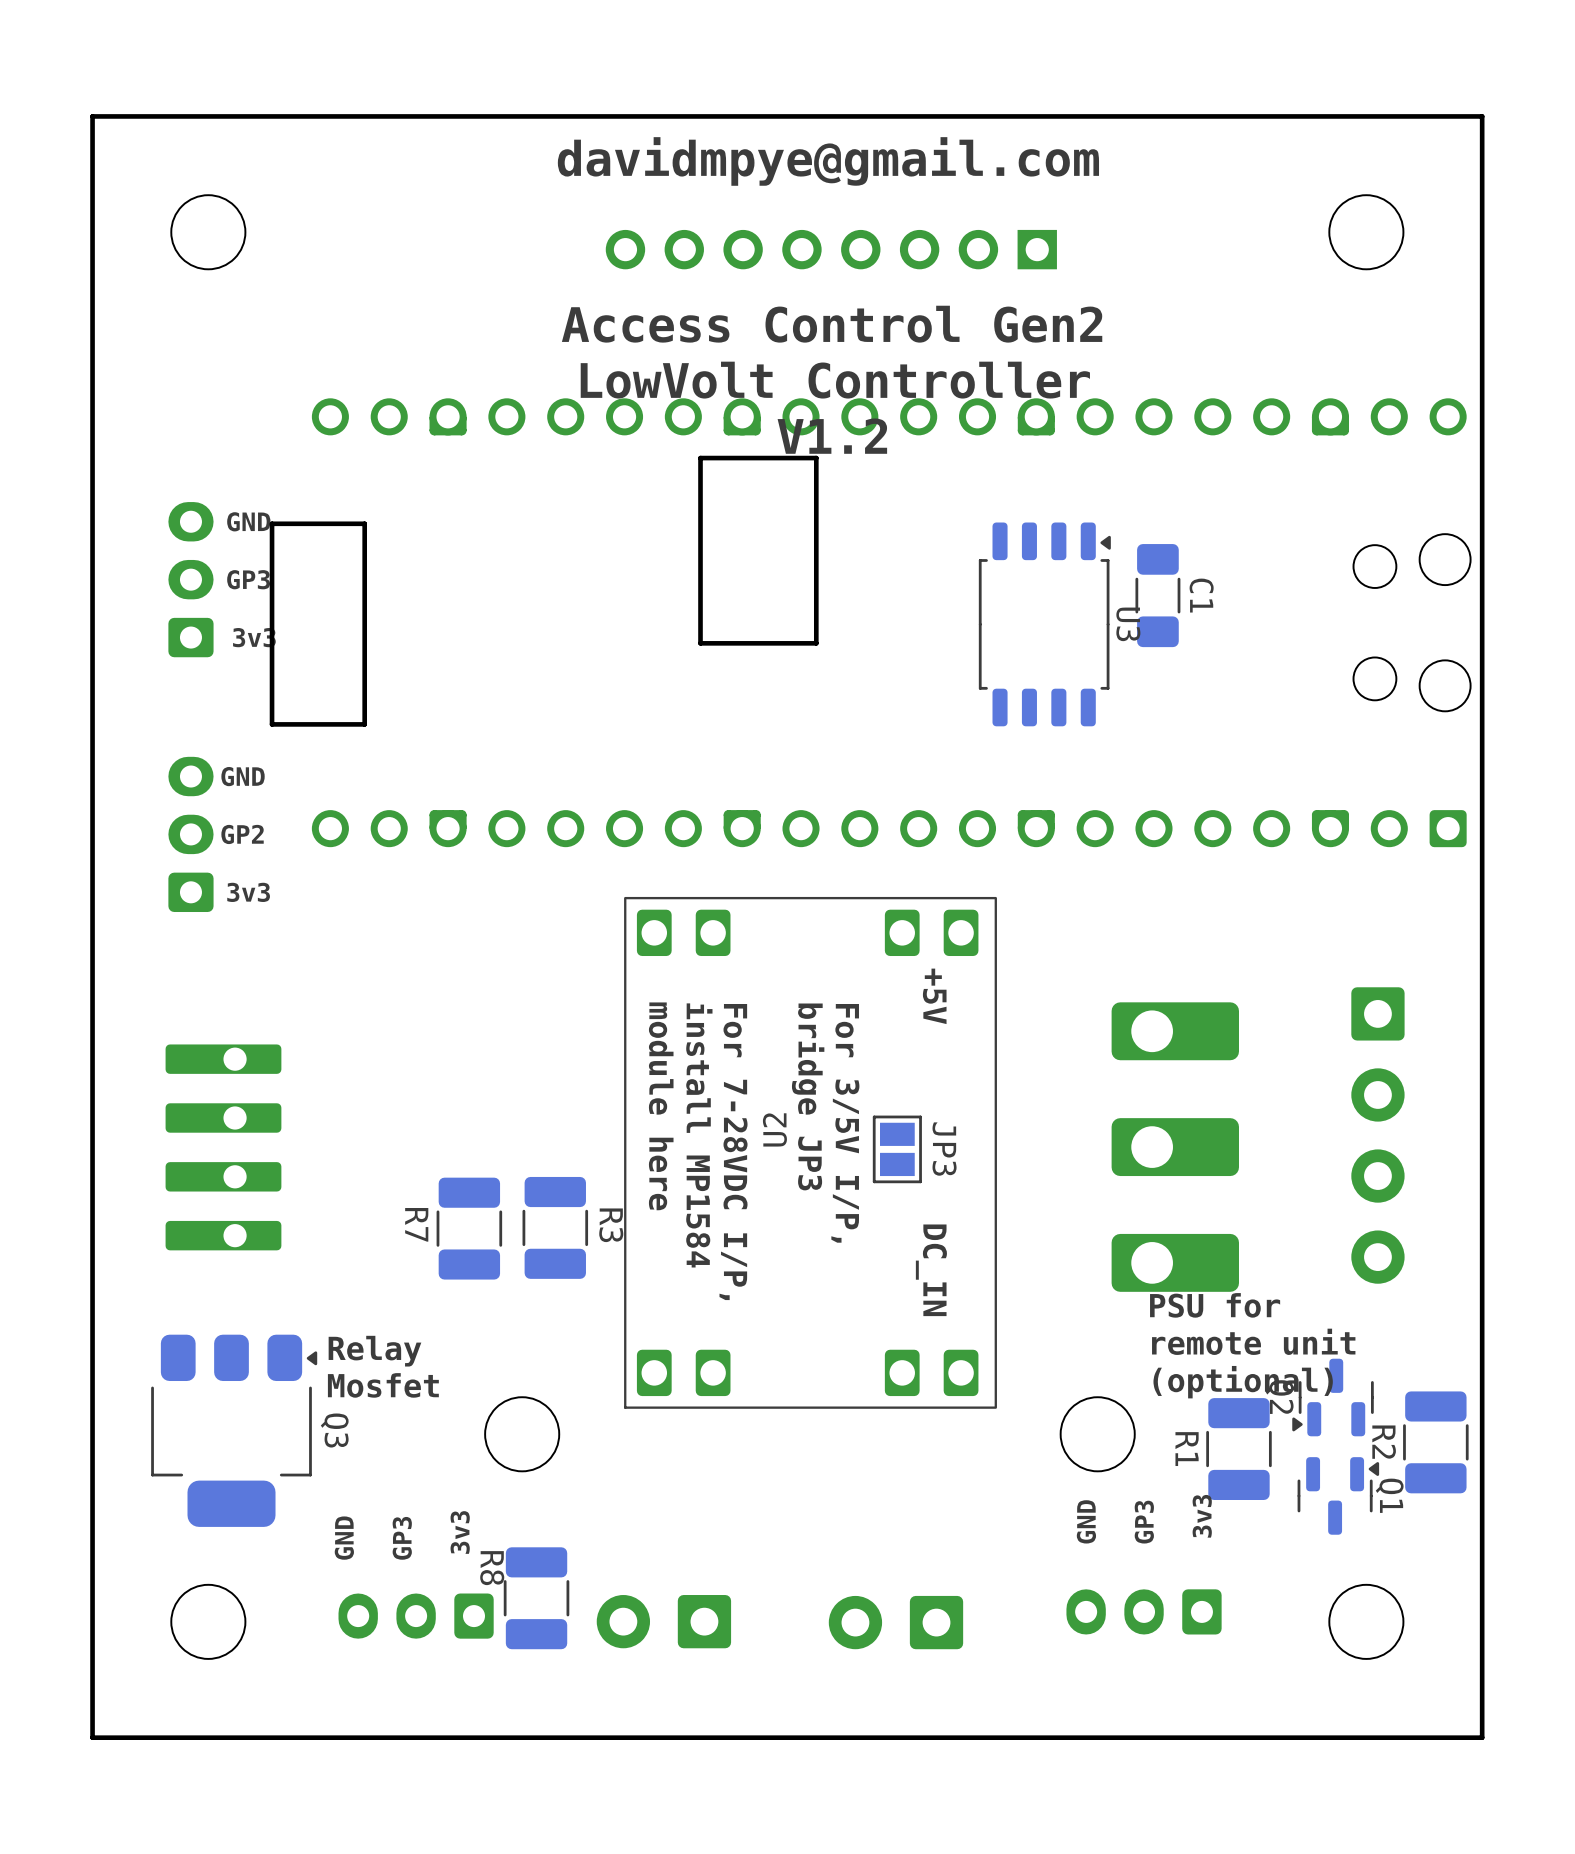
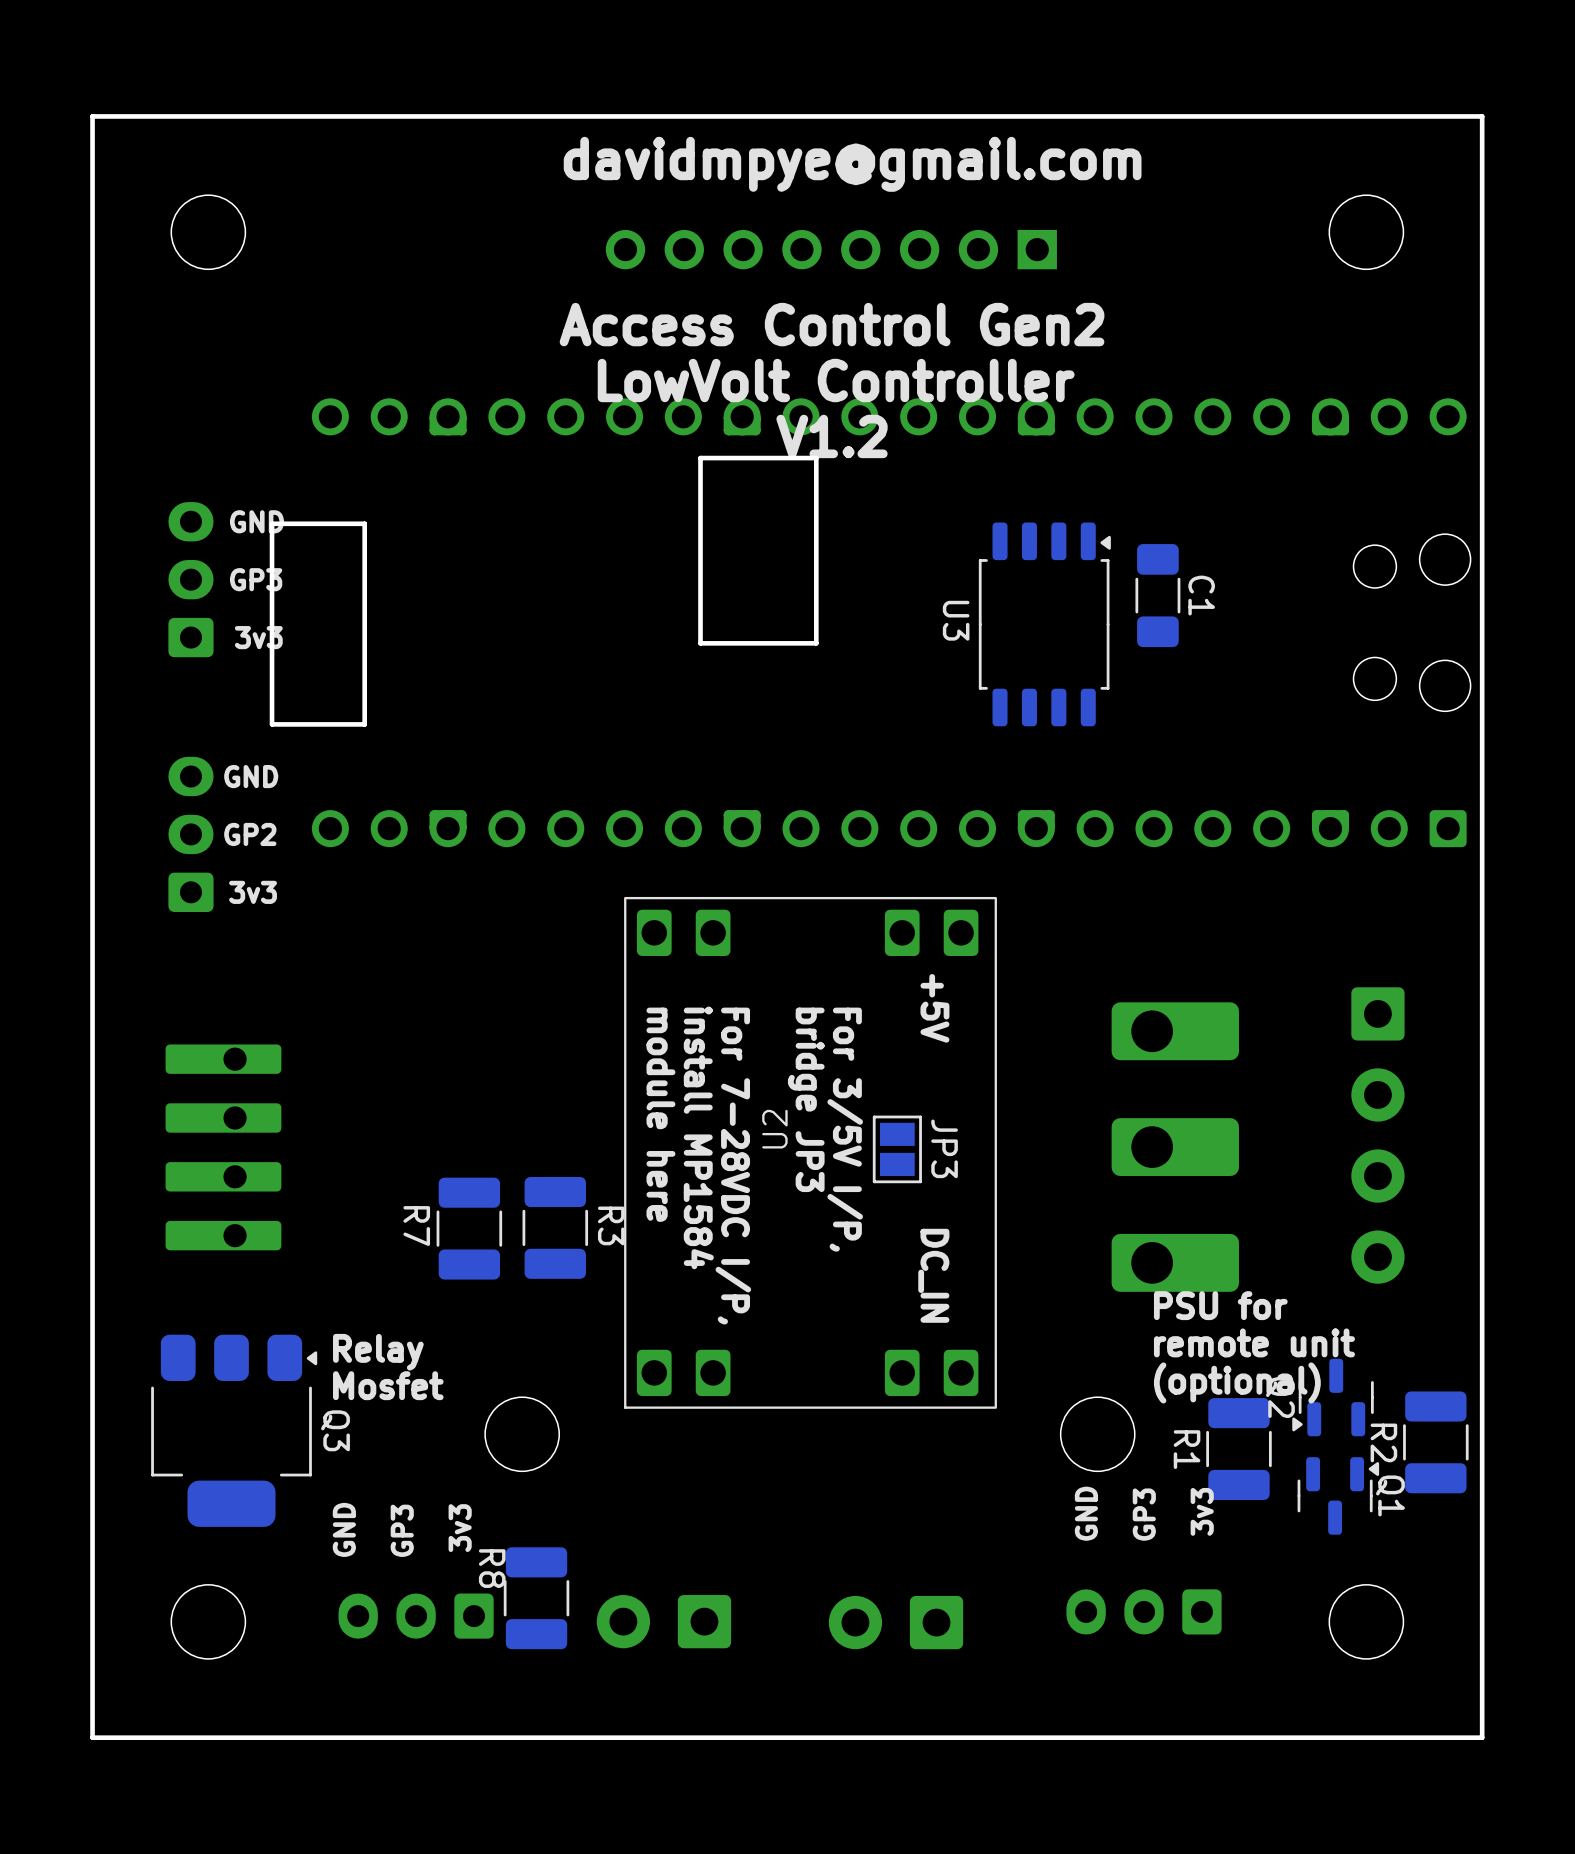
U3 name position: U3 (1128, 624) -> U3 (956, 620)

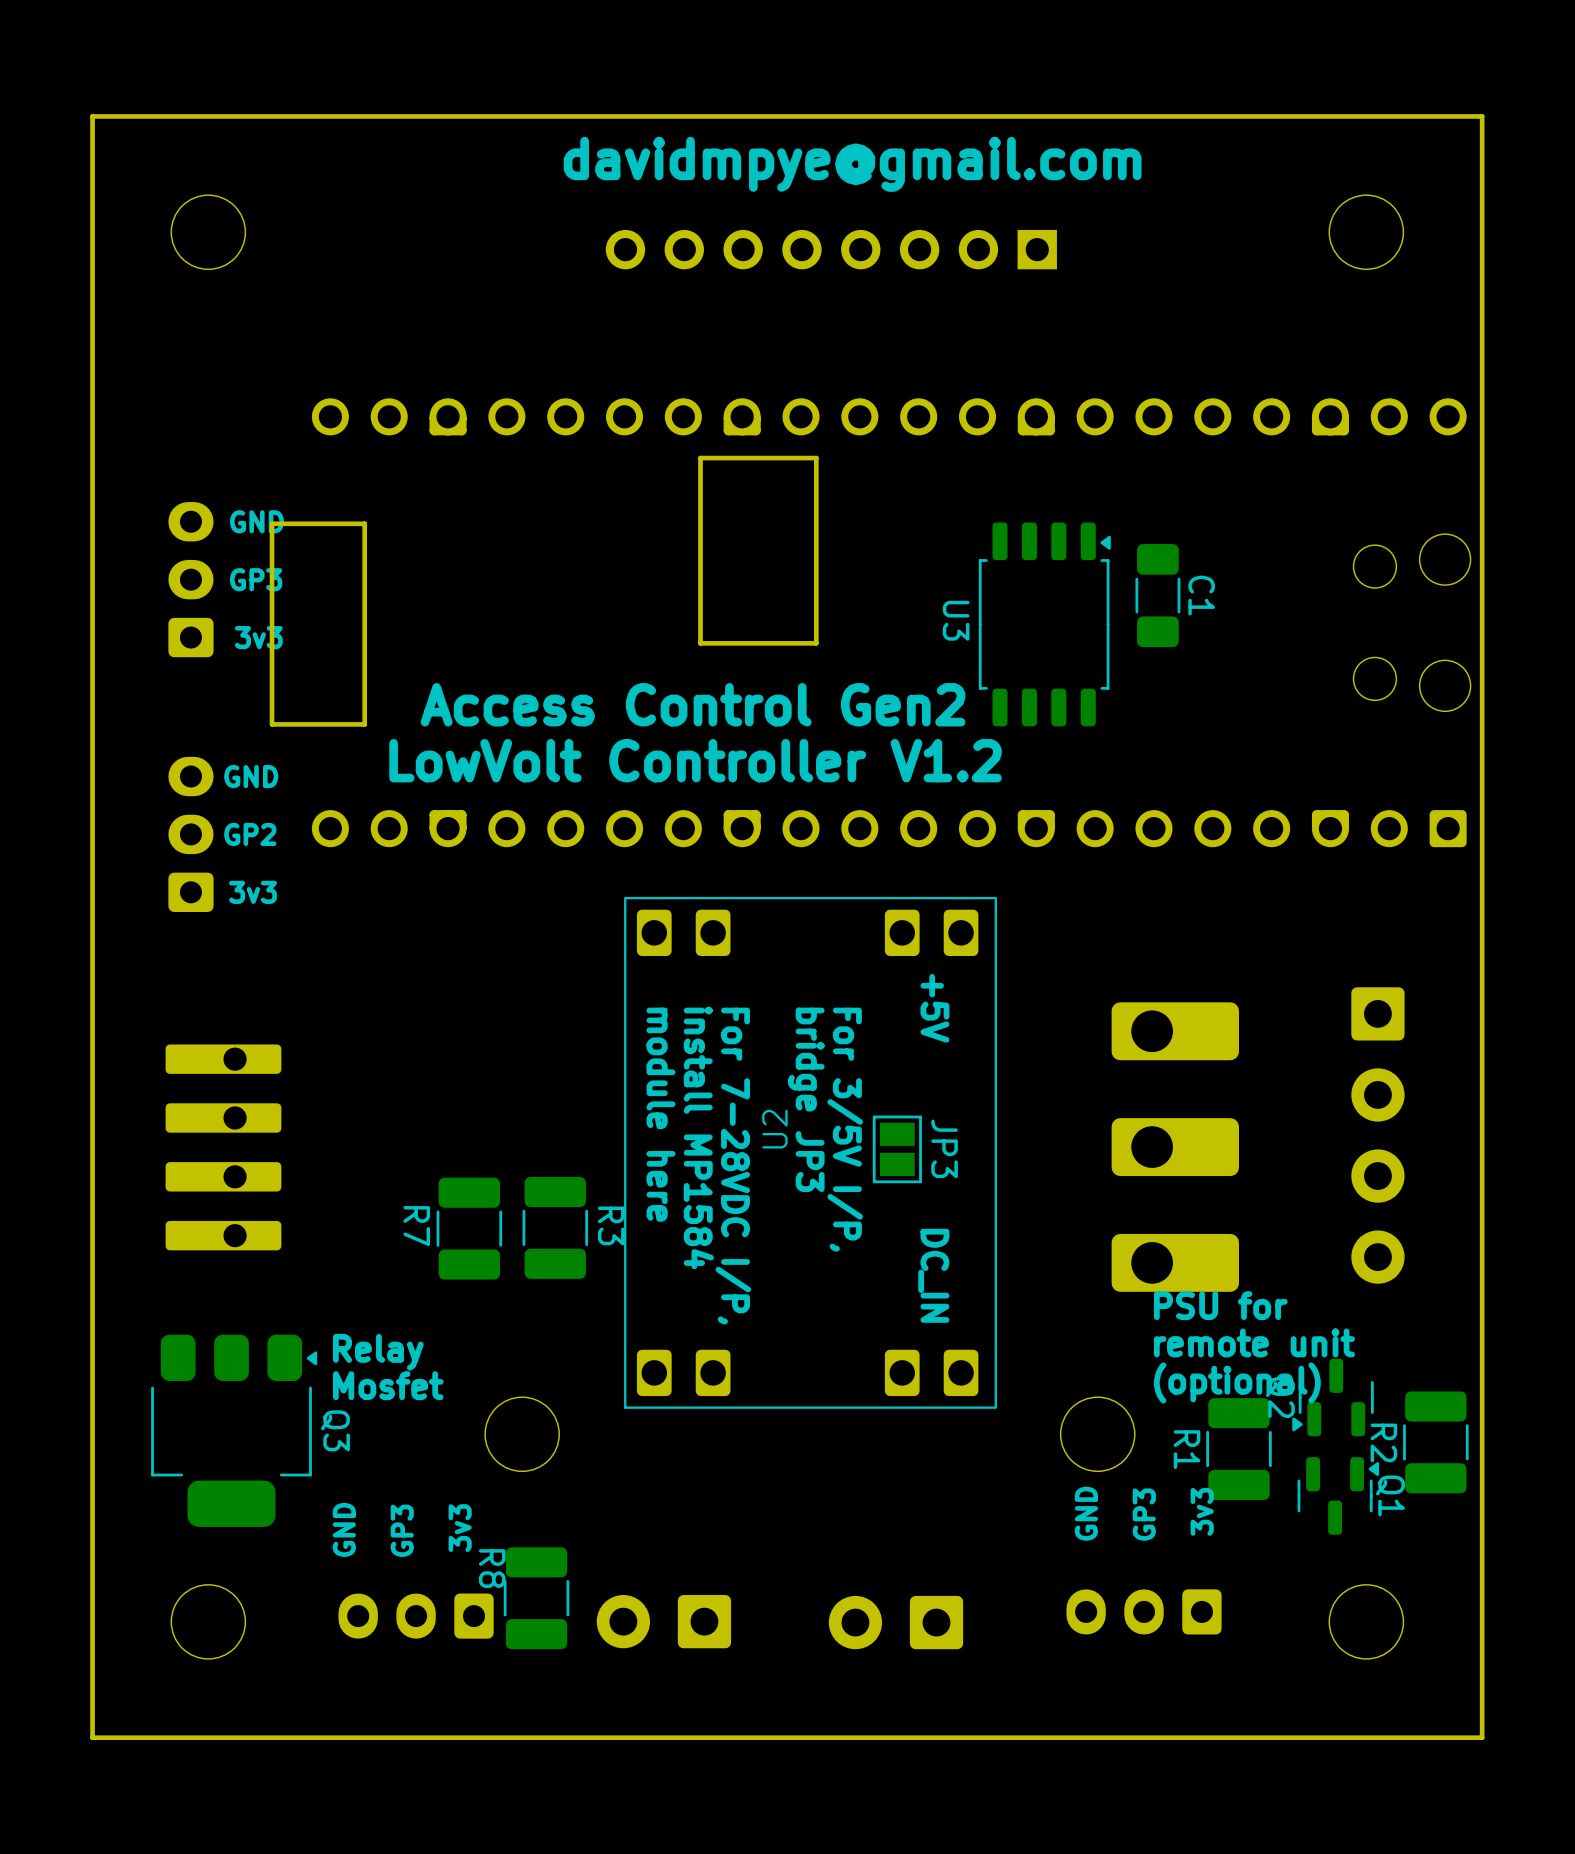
text position: Access Control Gen2 (832, 324) -> Access Control Gen2 (693, 704)
text: LowVolt Controller (836, 380) -> none
text: V1.2 (832, 436) -> none
text: none -> LowVolt Controller V1.2 (695, 760)

